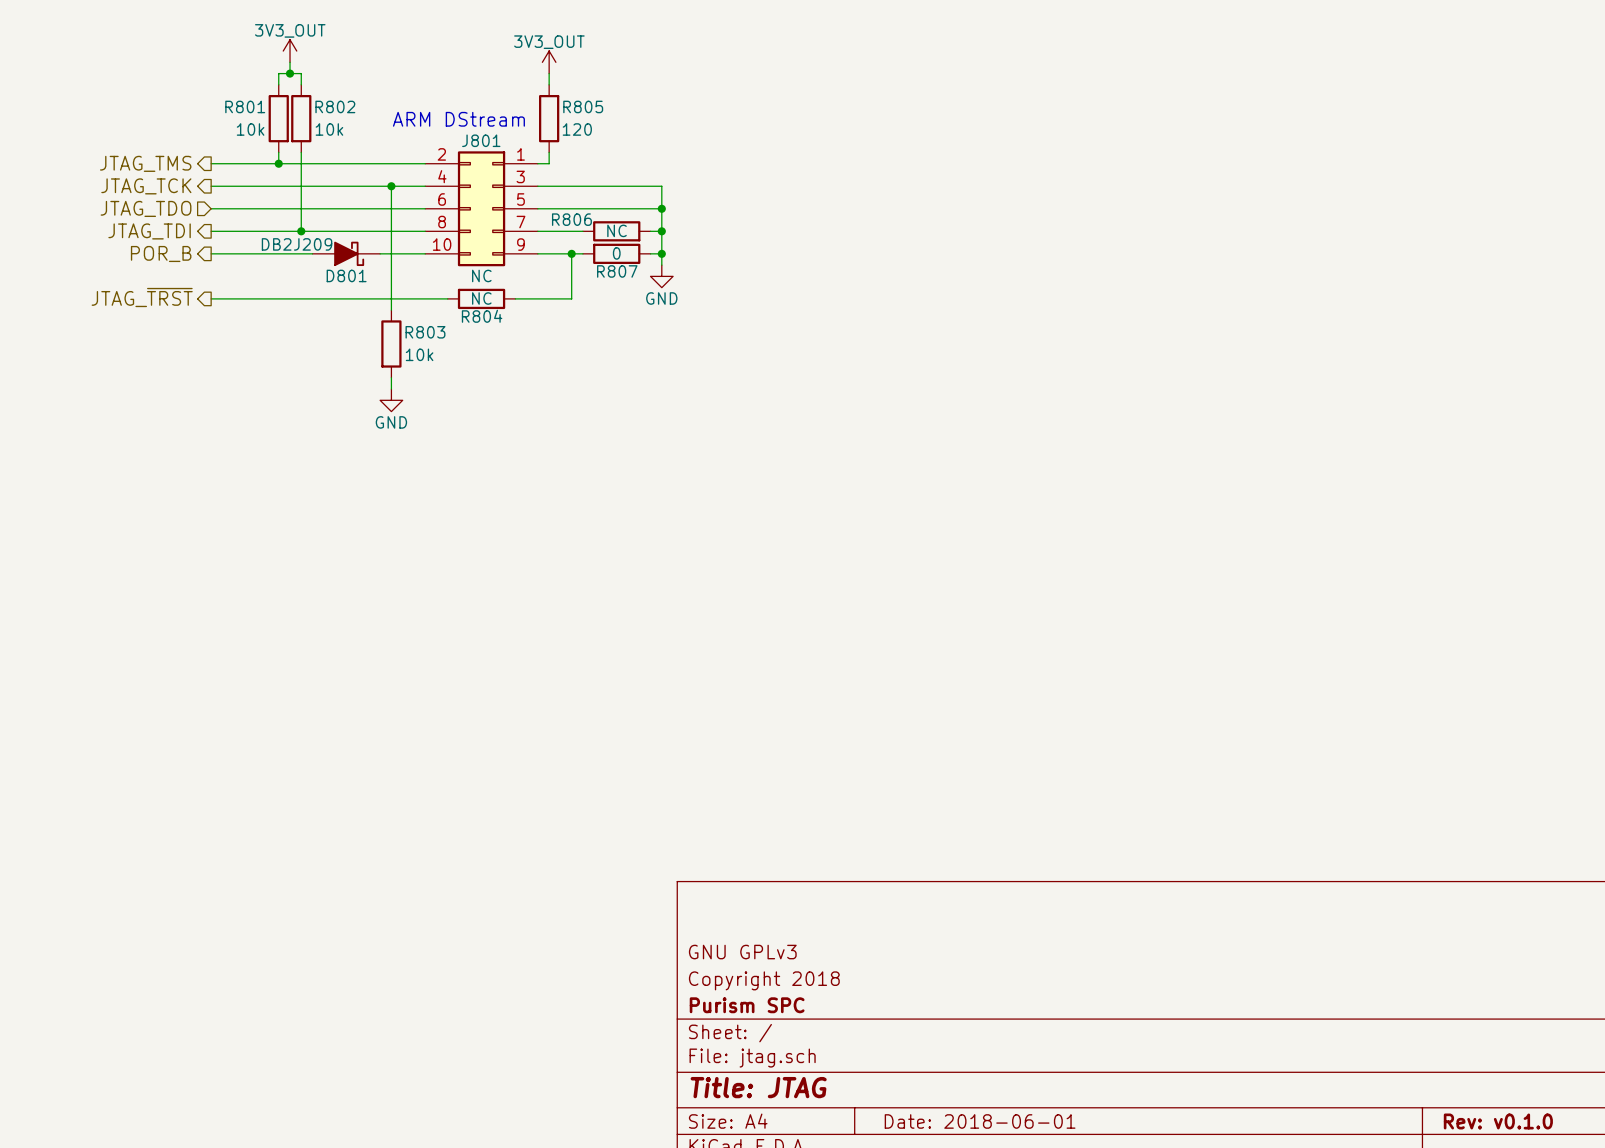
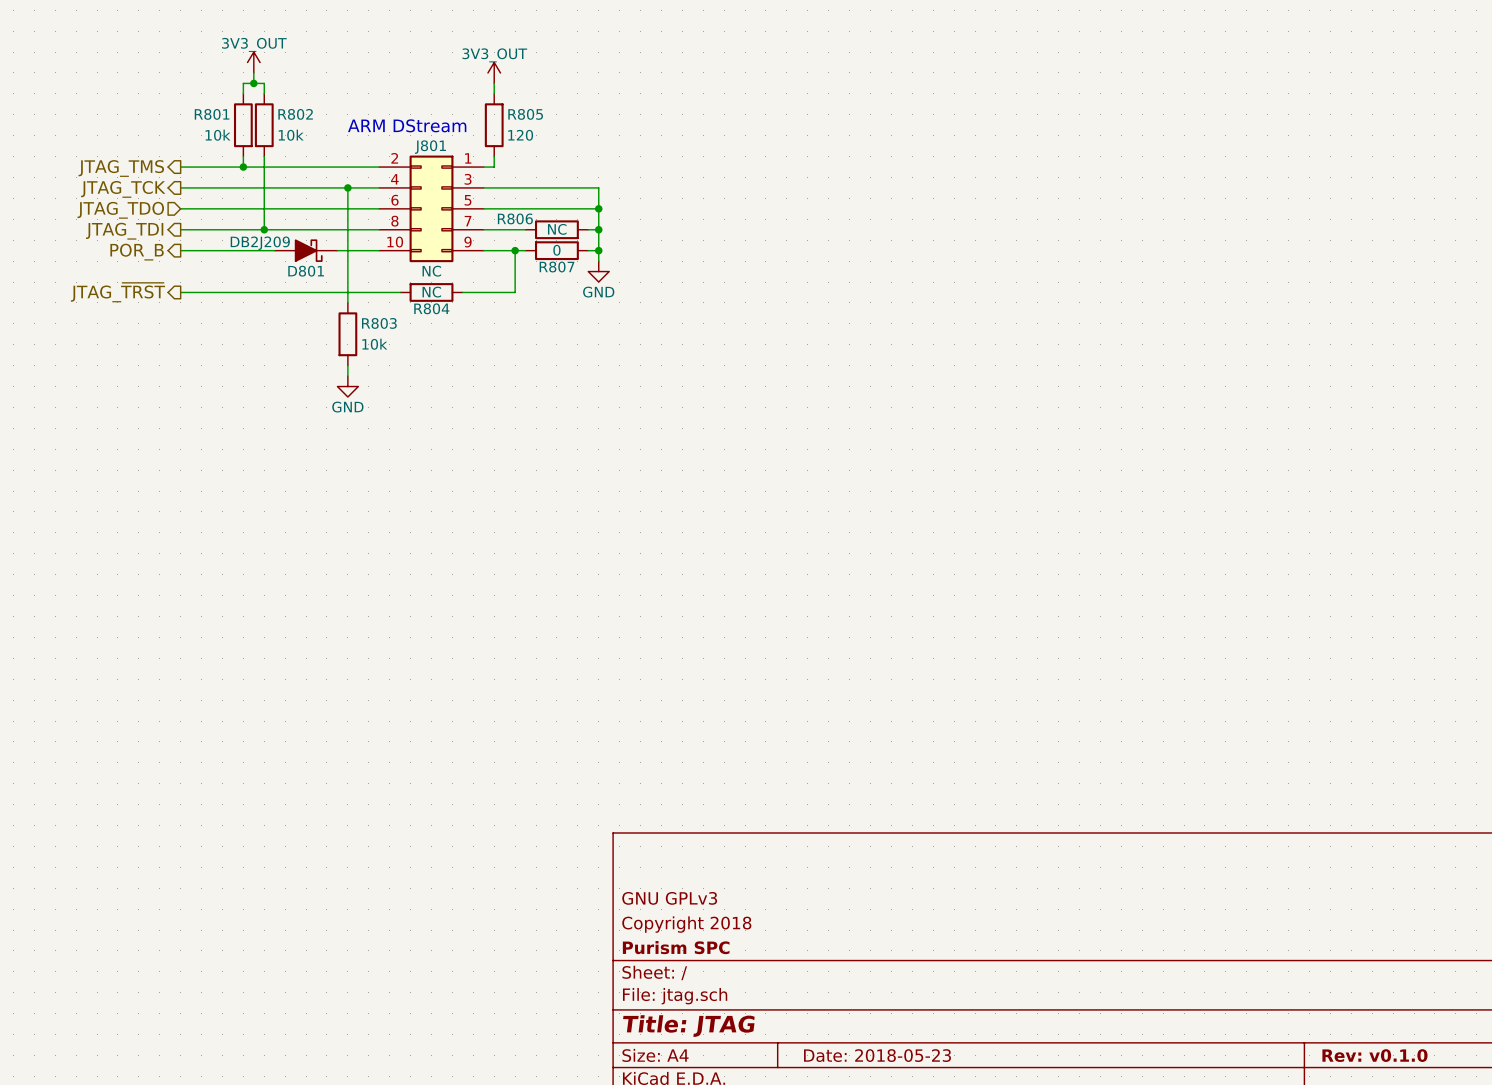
title block: Date: 2018-06-01 (980, 1121) -> Date: 2018-05-23 (877, 1055)

